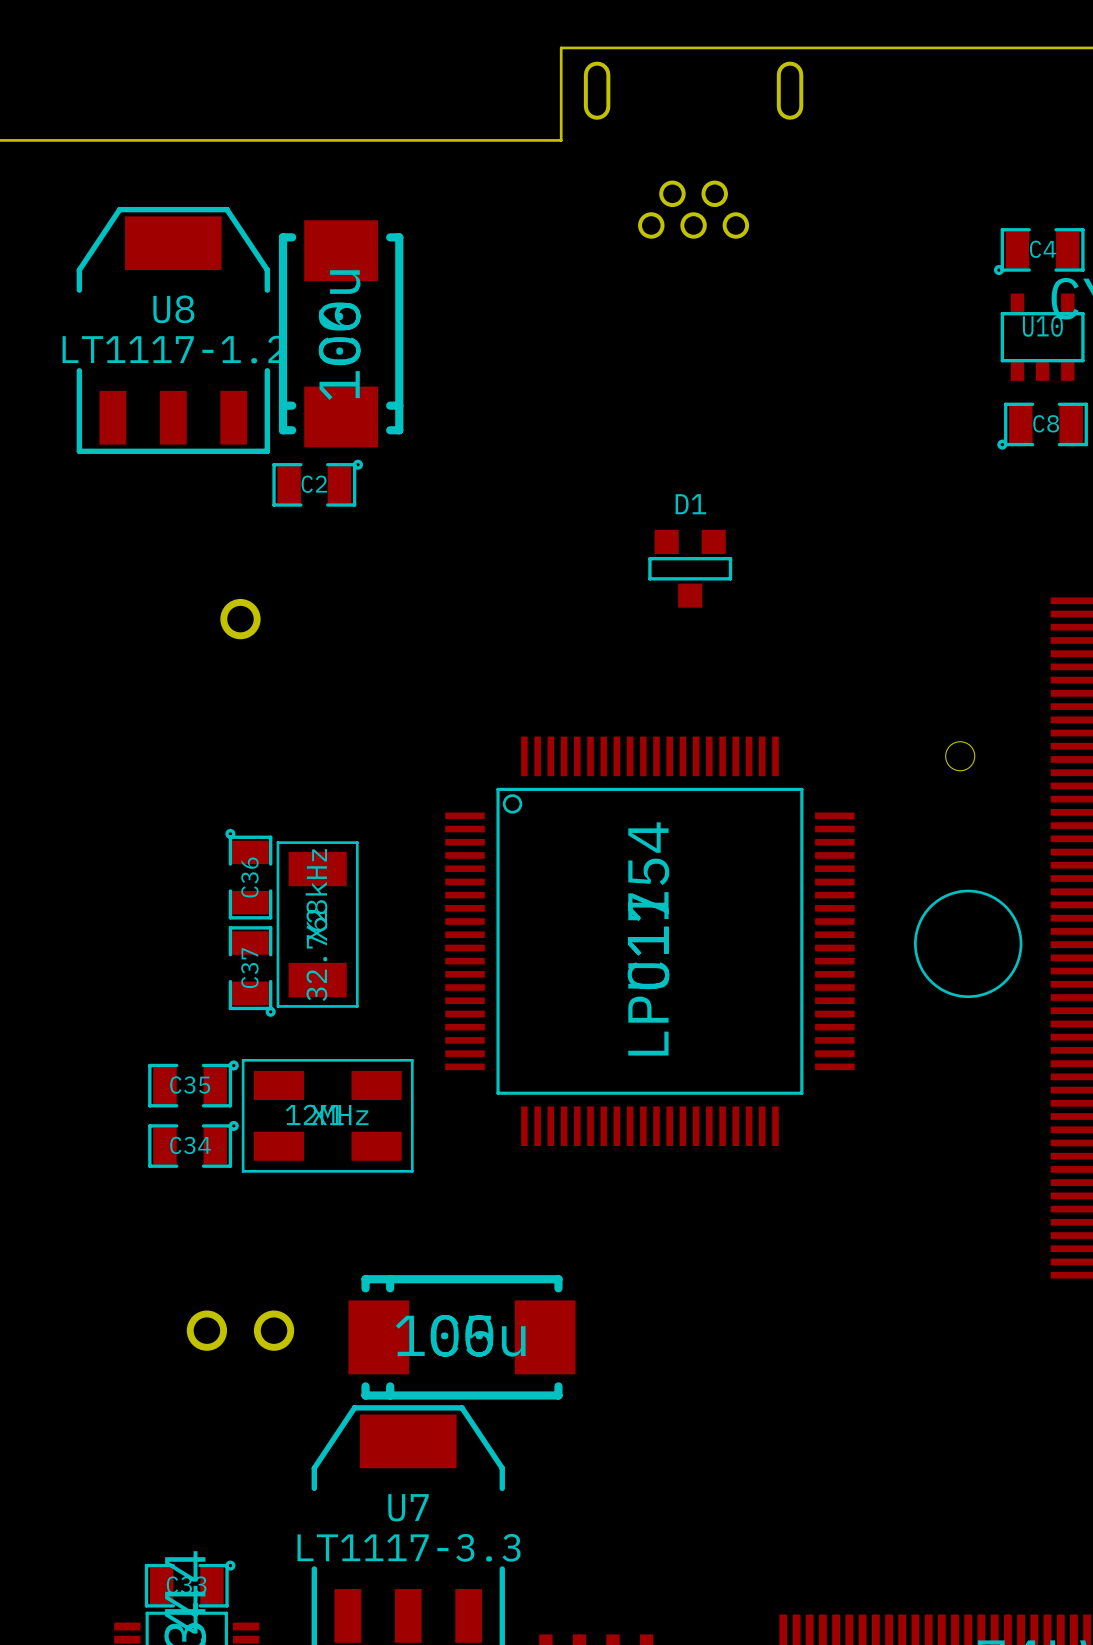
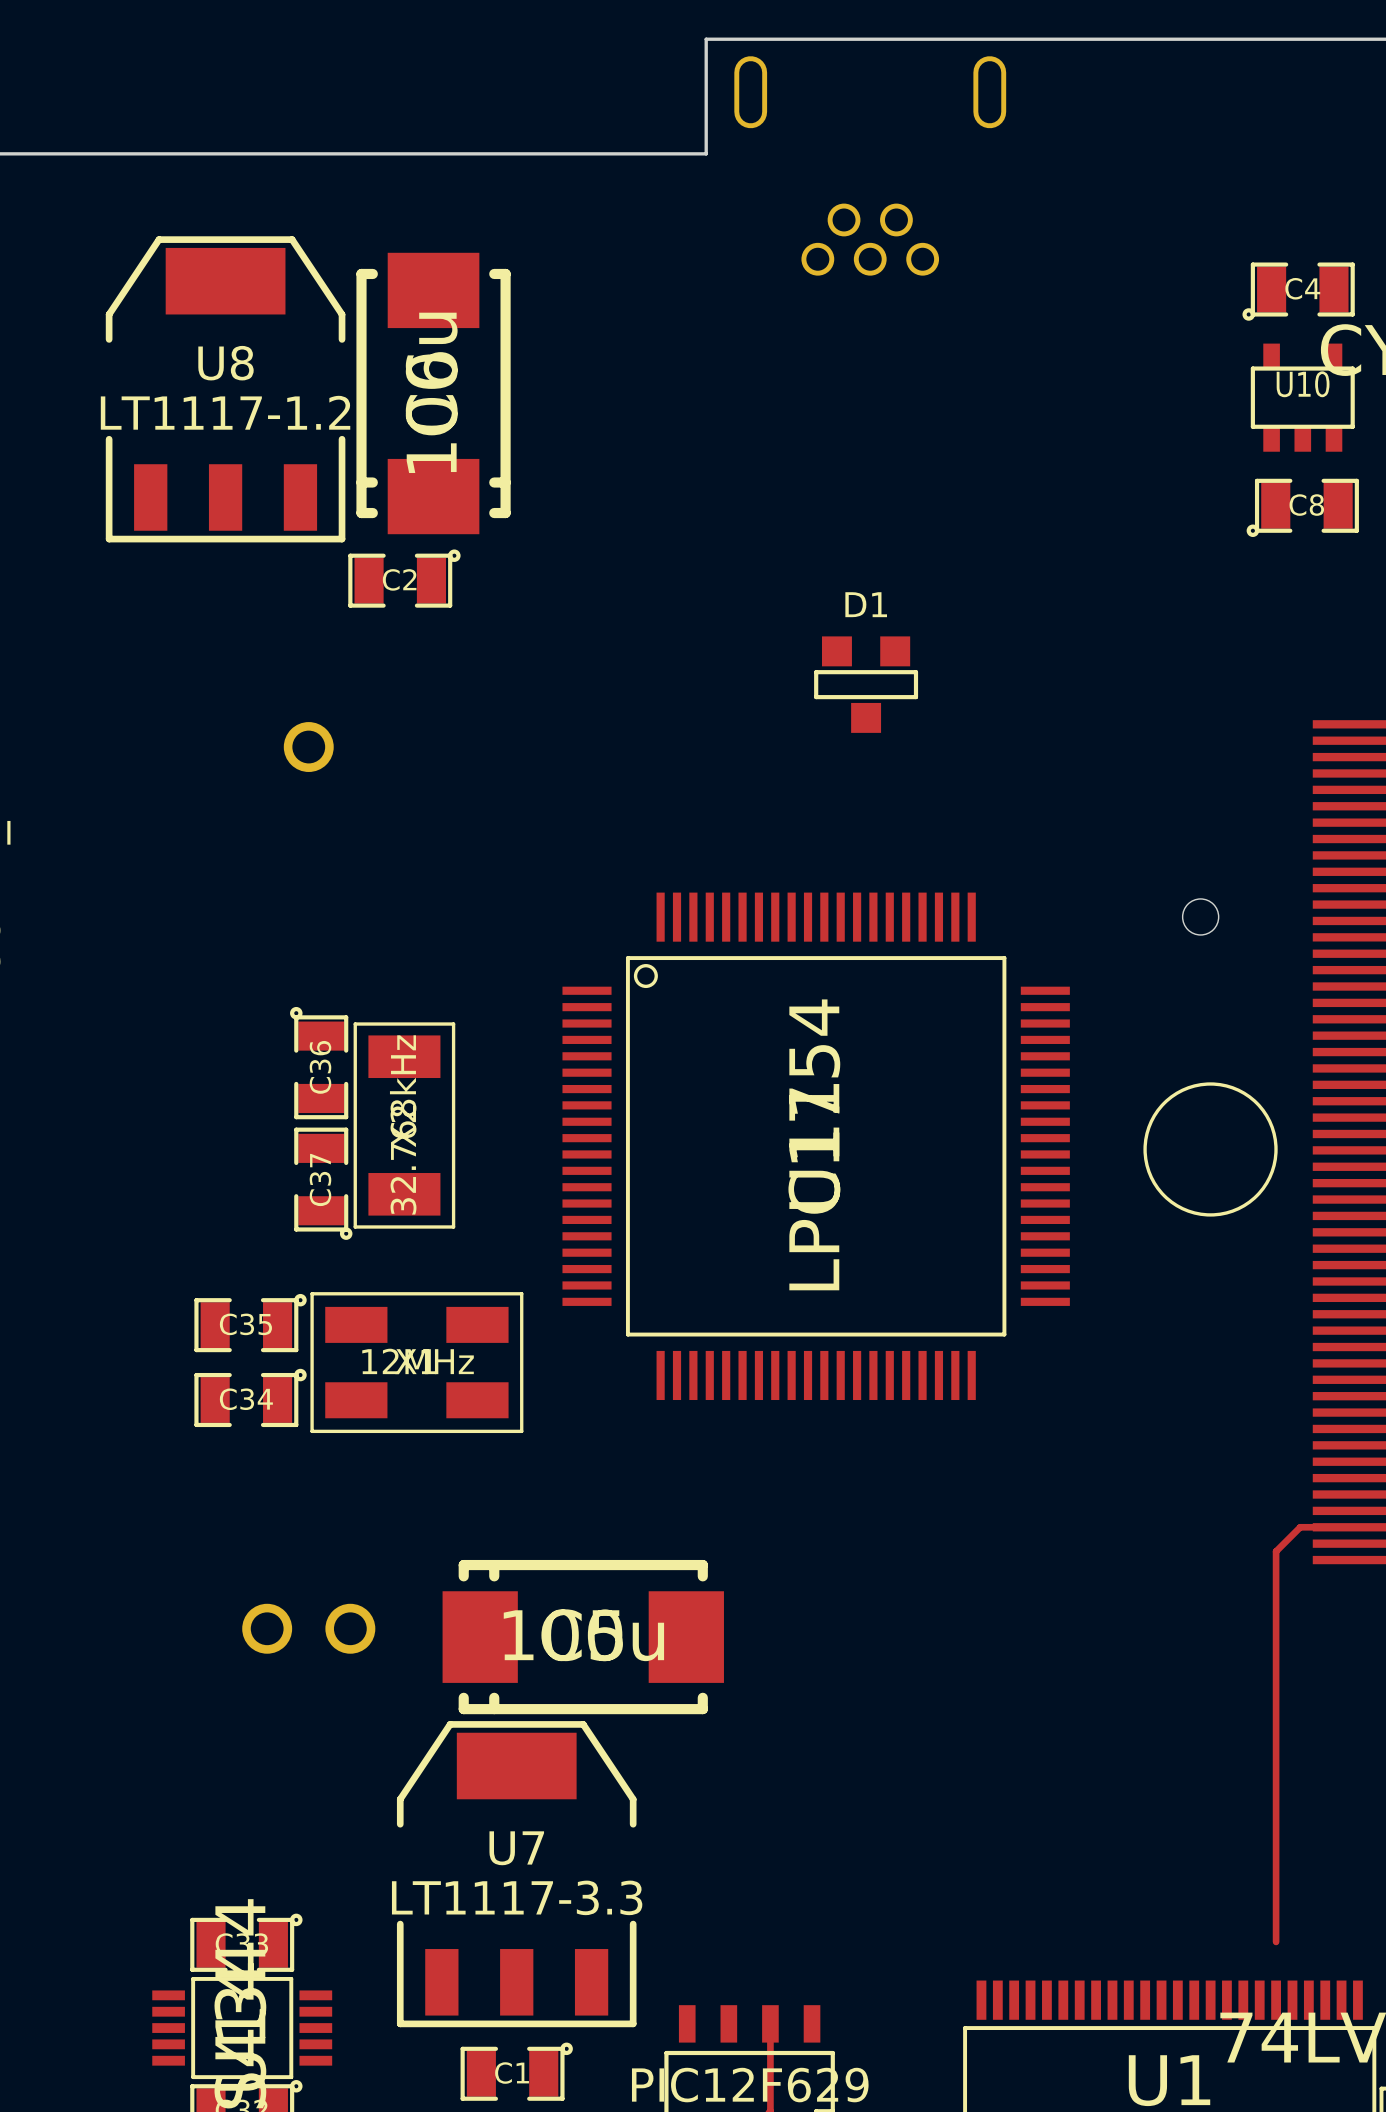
track: none -> (1354, 1527) (1300, 1527) (1276, 1551) (1276, 1941)

